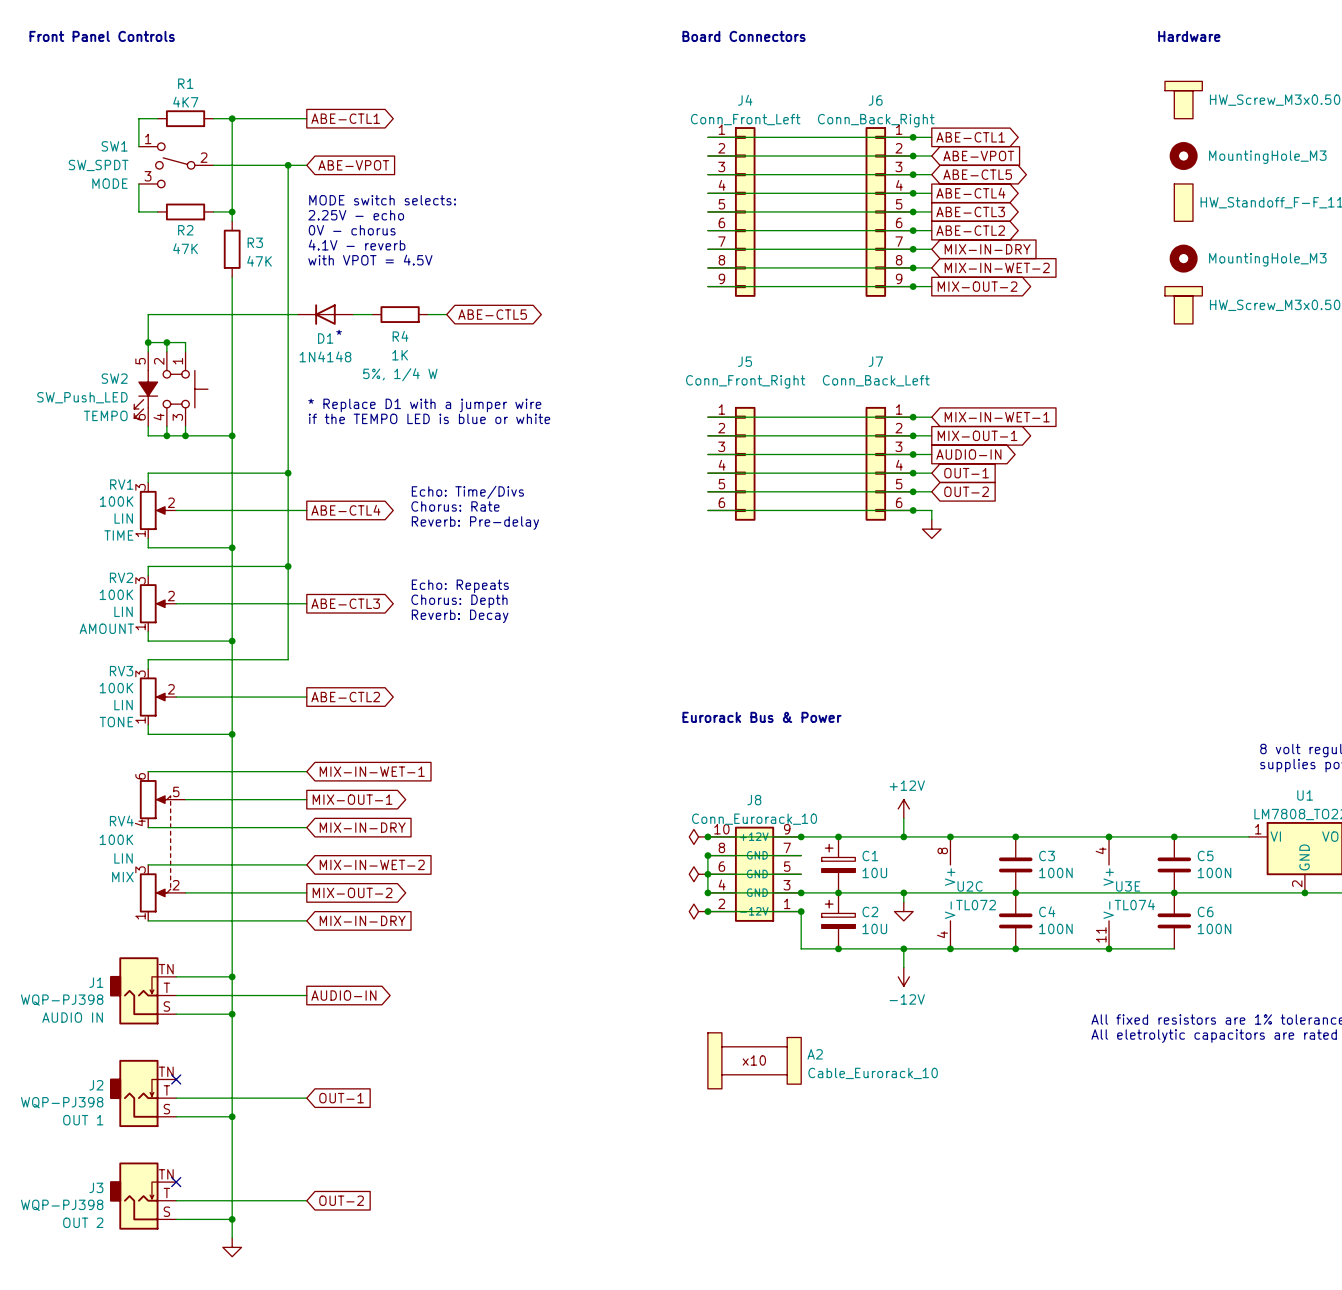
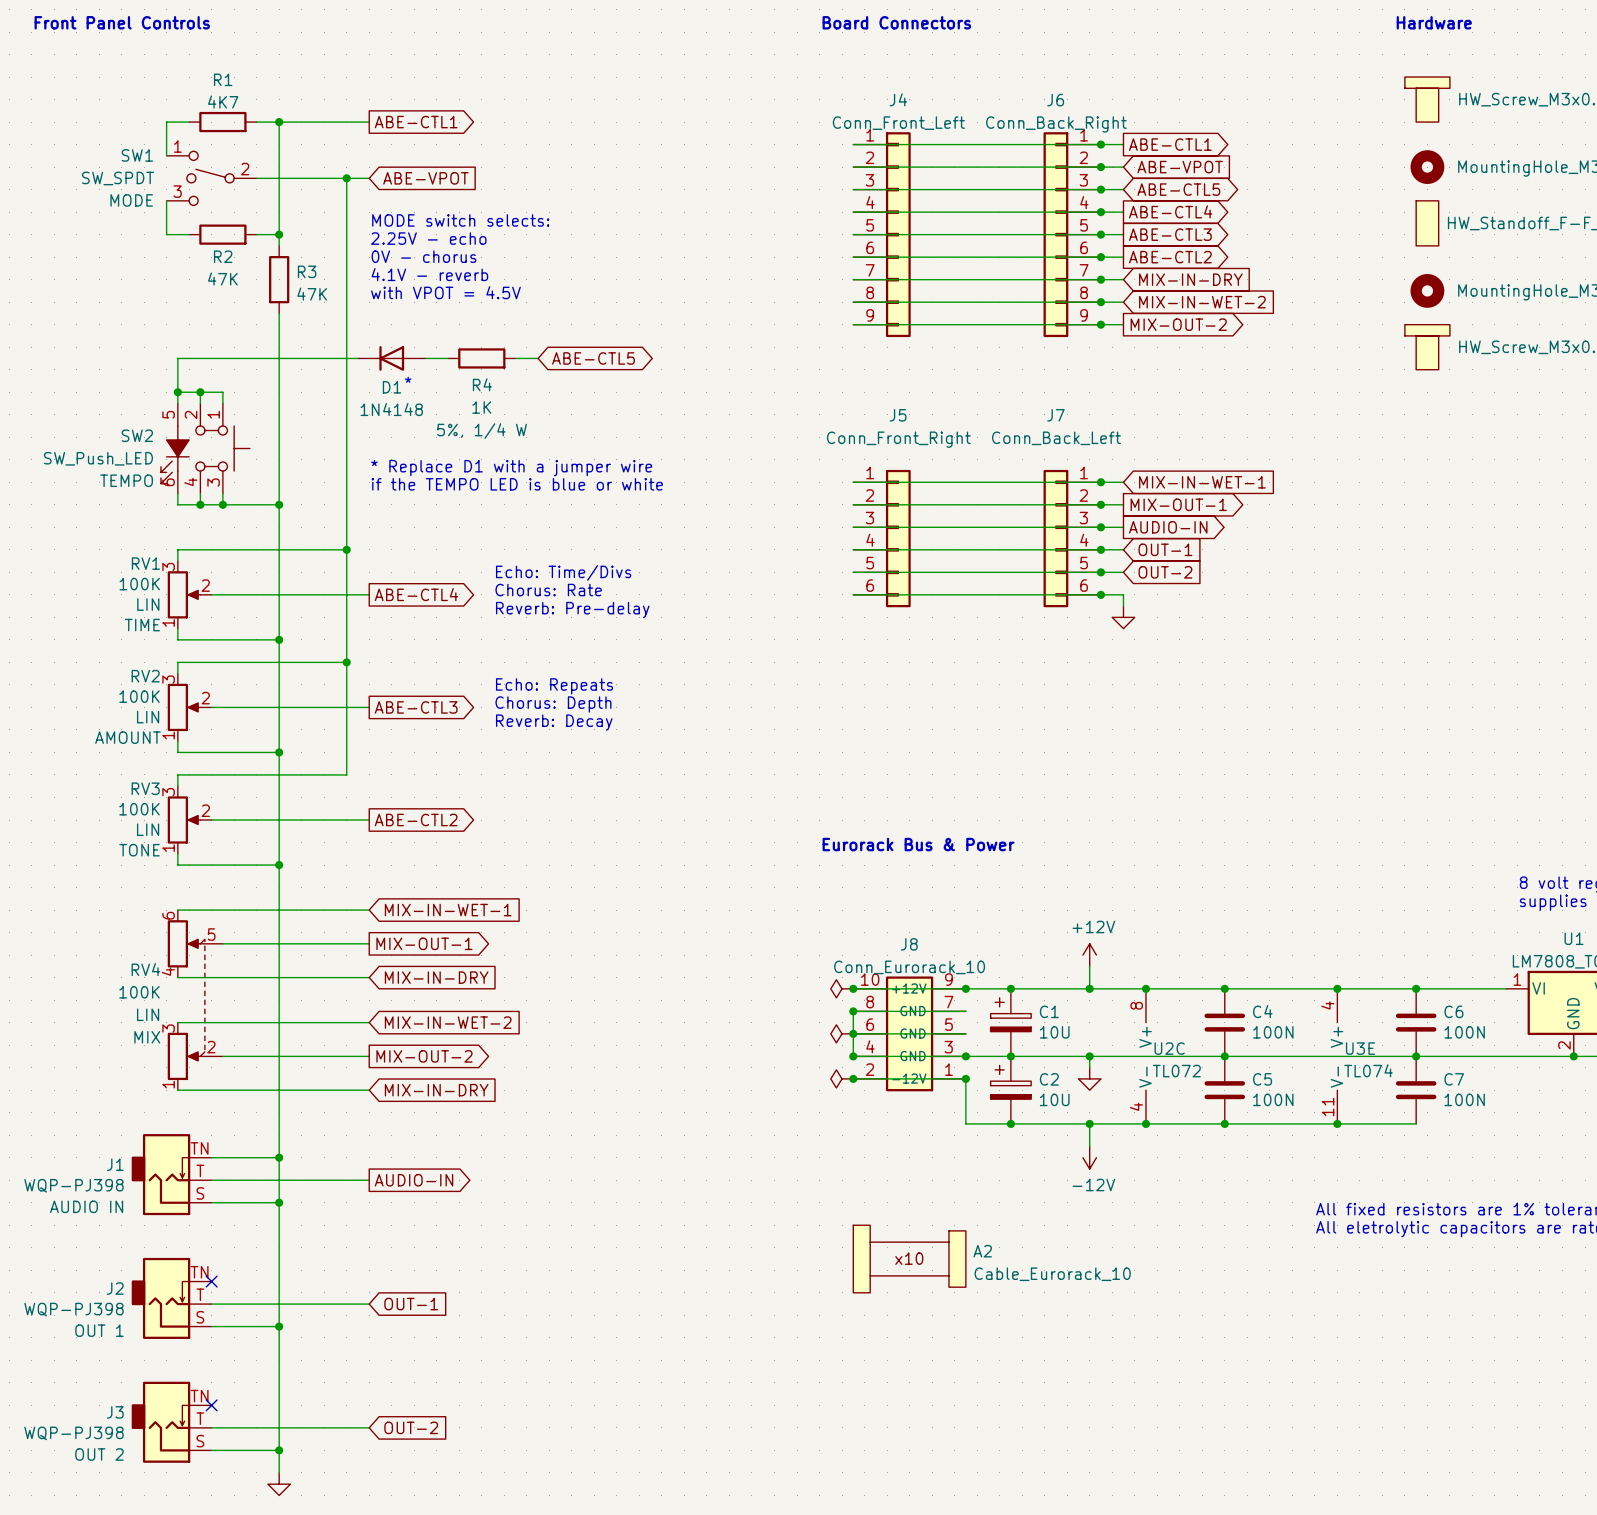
C3 name: C3 (1047, 856) -> C4 (1262, 1011)
C5 name: C5 (1205, 856) -> C6 (1453, 1011)
C4 name: C4 (1047, 911) -> C5 (1262, 1079)
C6 name: C6 (1205, 911) -> C7 (1454, 1079)

